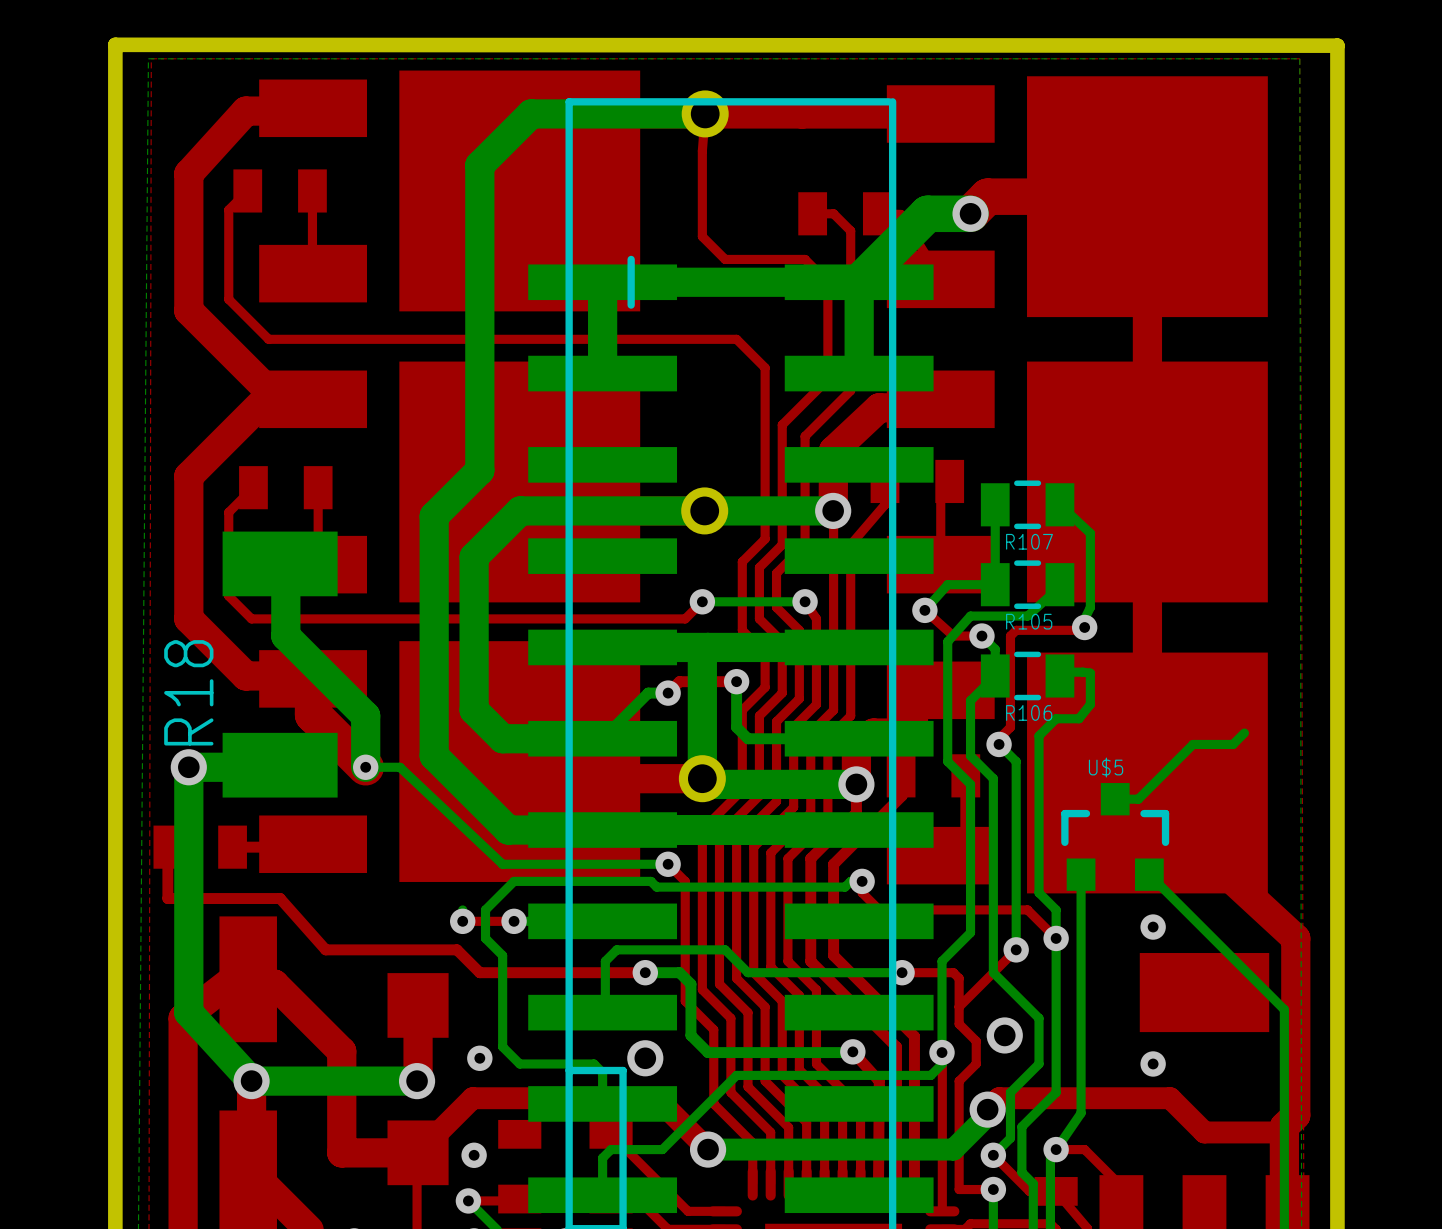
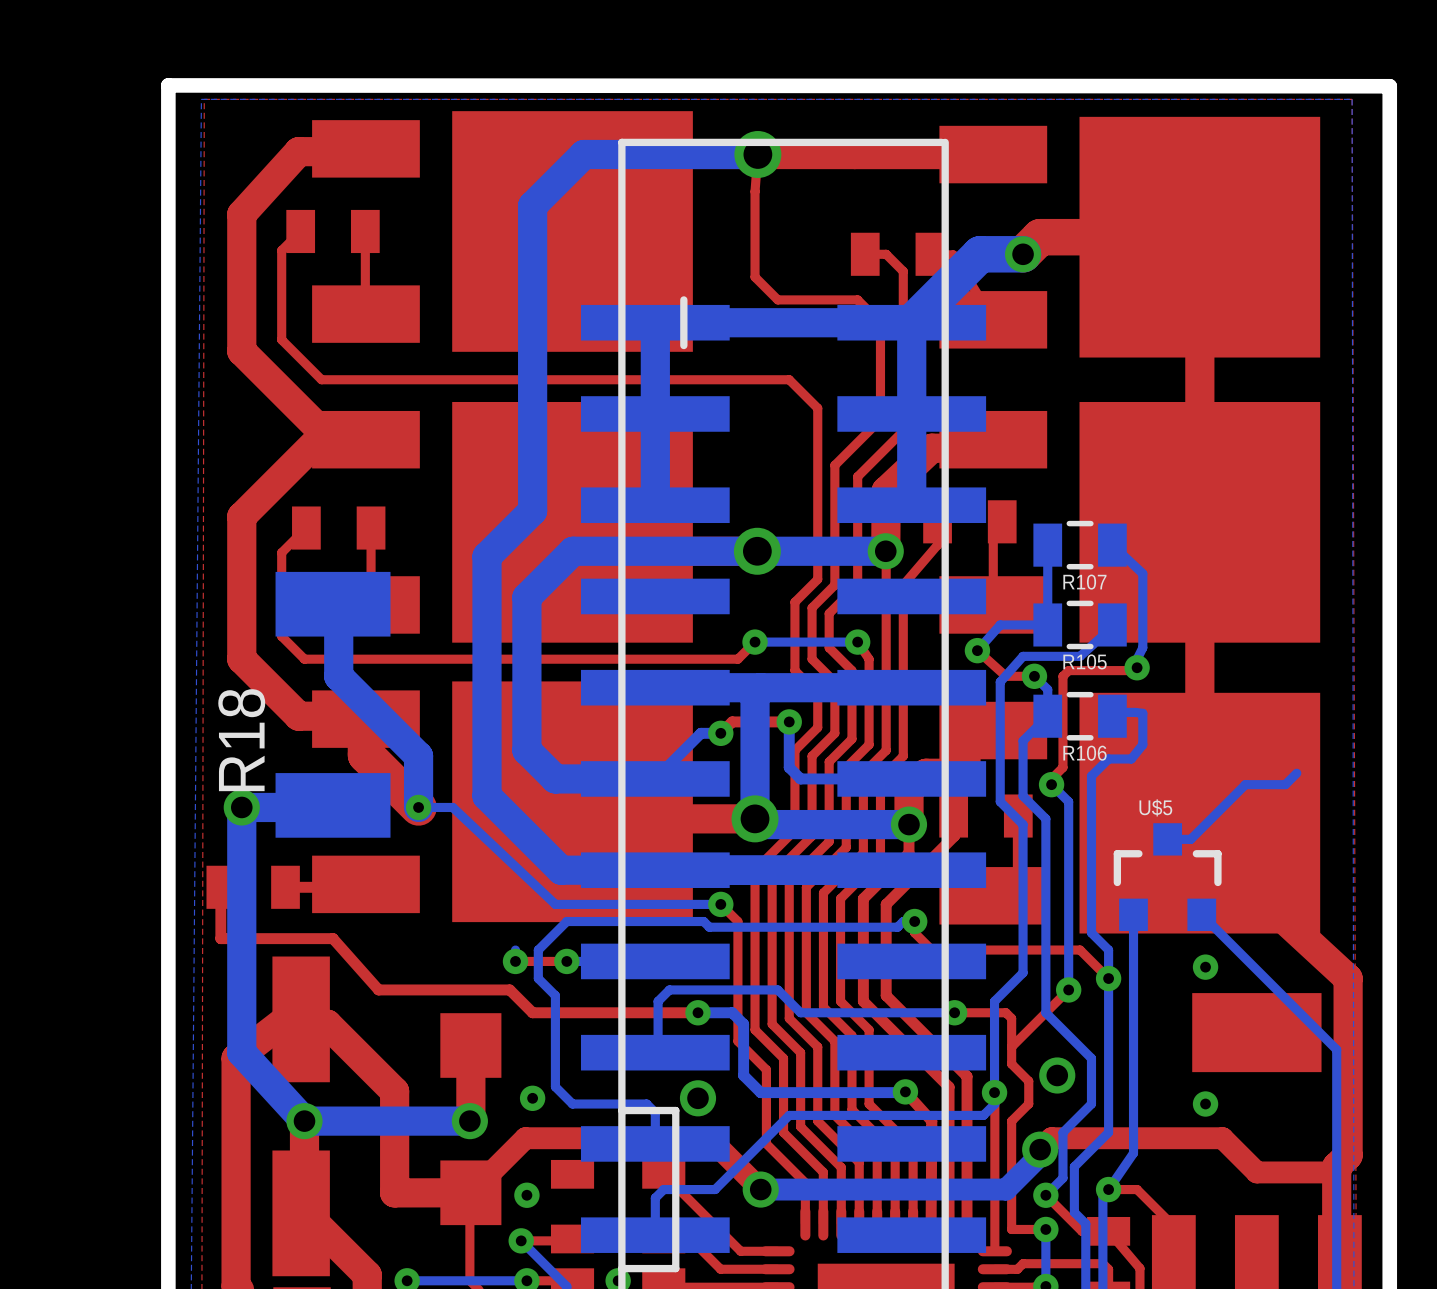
bottom track: none -> (655, 413) (655, 505)
bottom track: none -> (911, 413) (911, 505)

